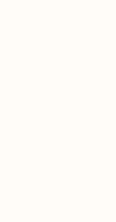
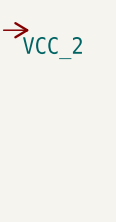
power symbol: none -> VCC_2 (15, 30)

